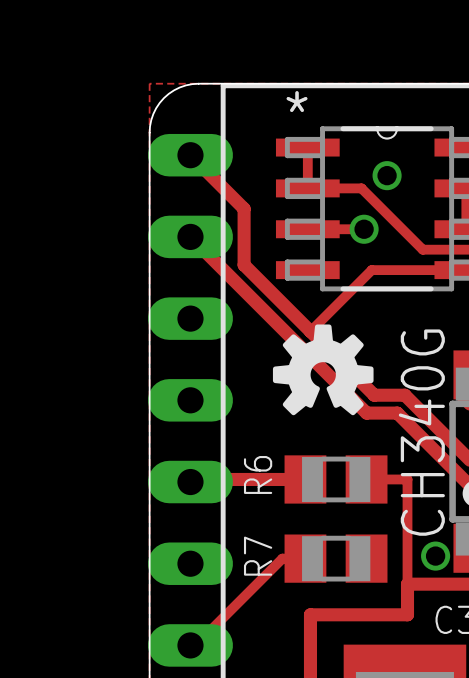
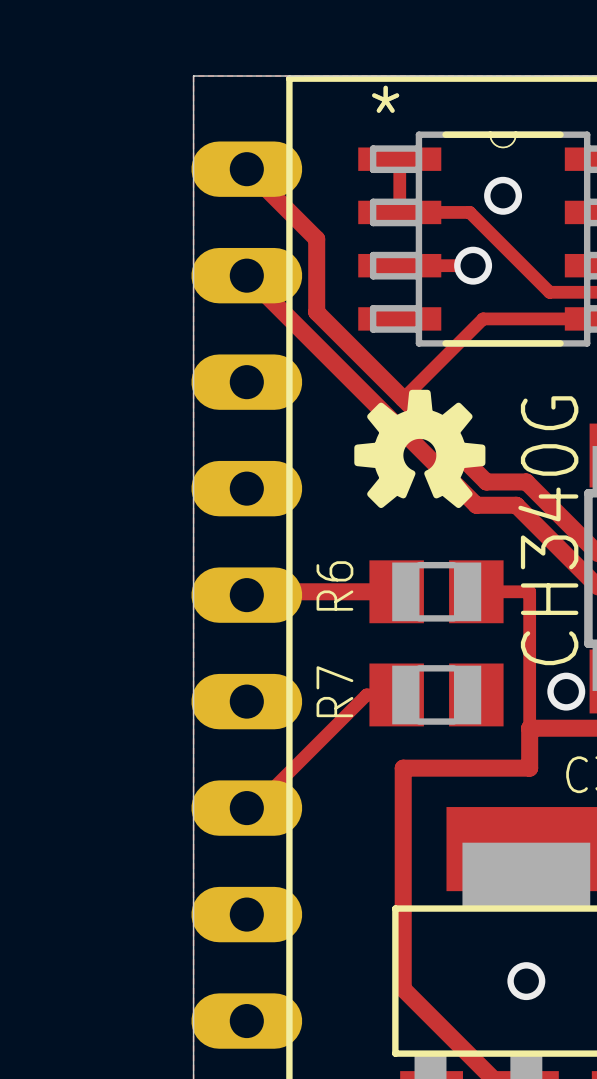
board edge: (198, 83) (179, 87) (163, 98) (153, 113) (149, 132) -> (257, 76) (193, 76) (193, 139)

